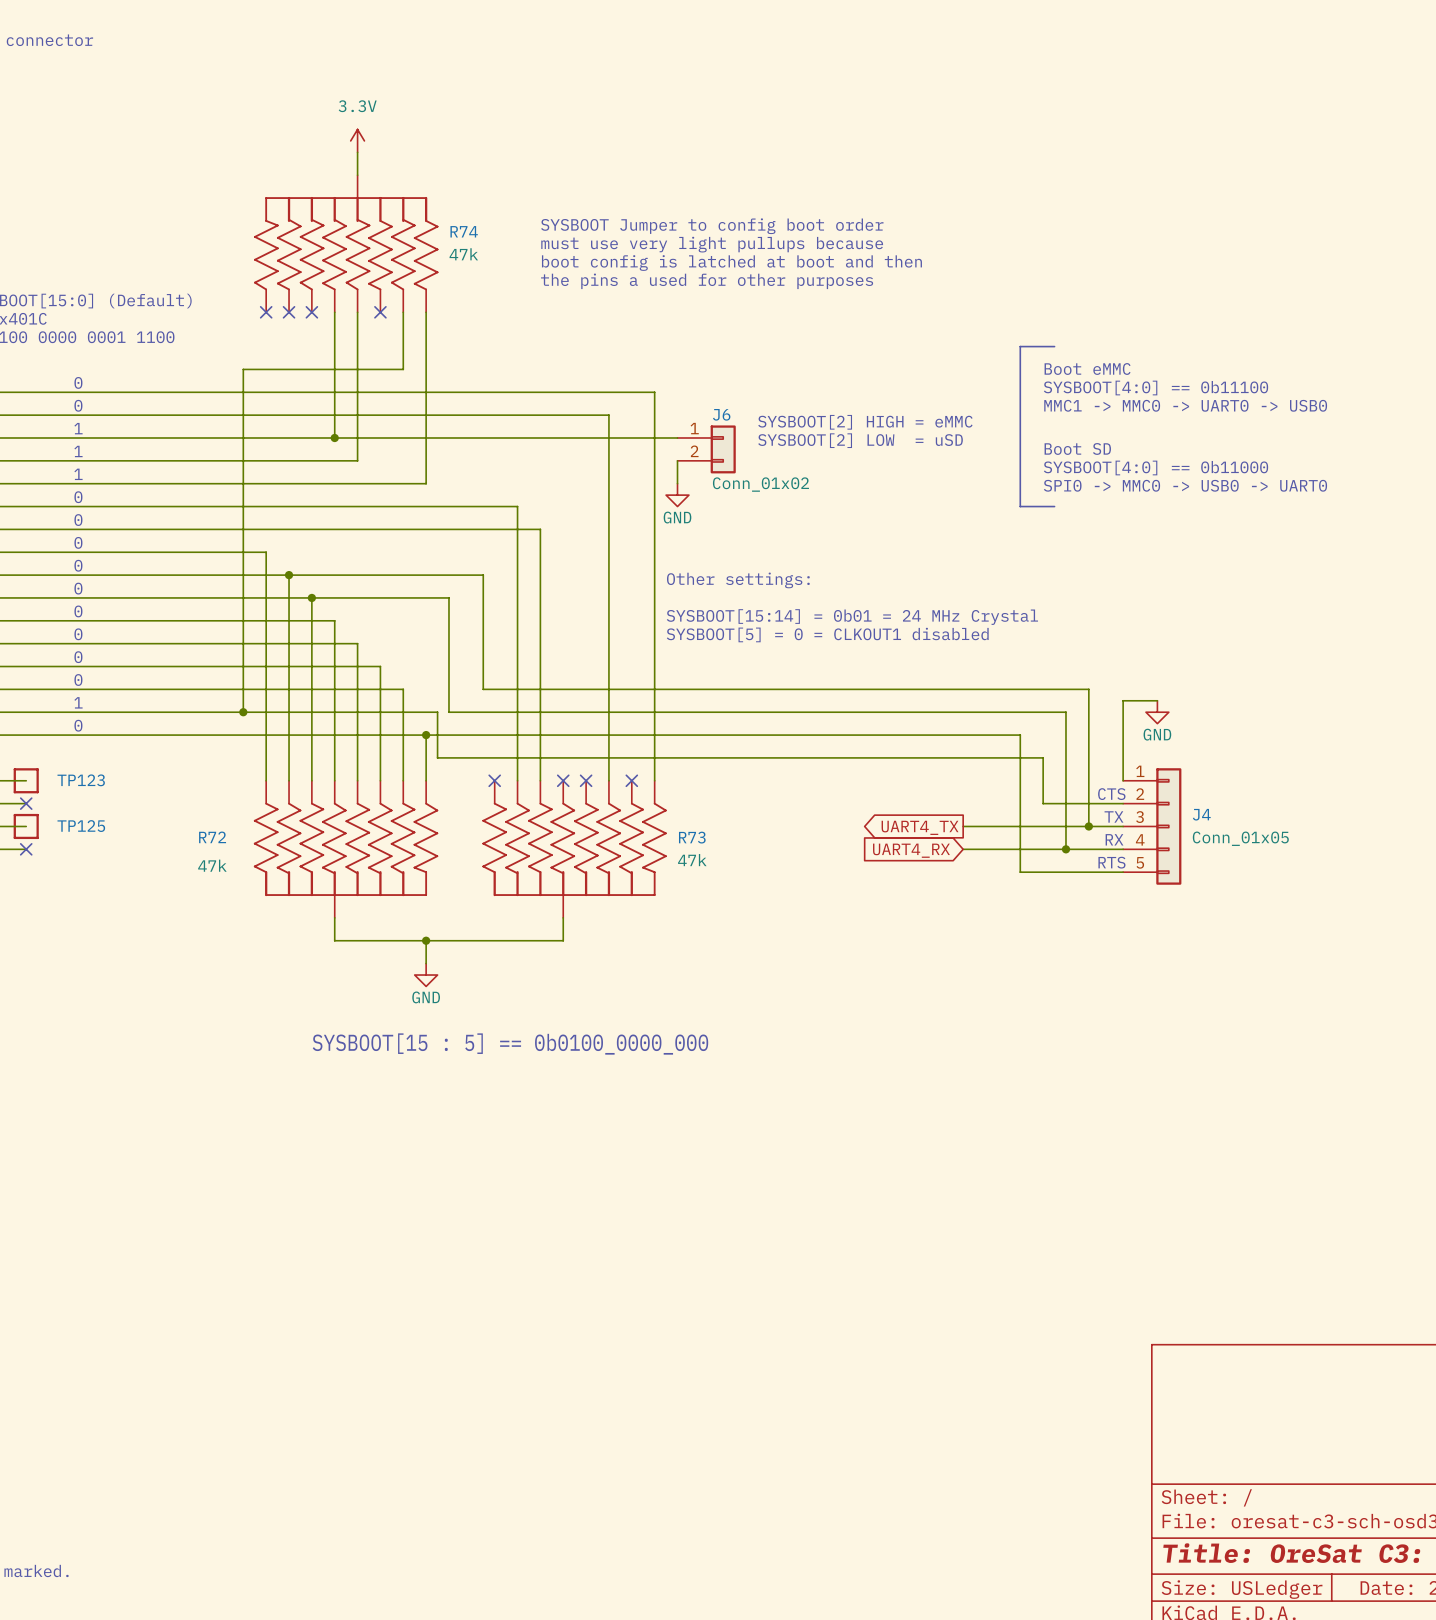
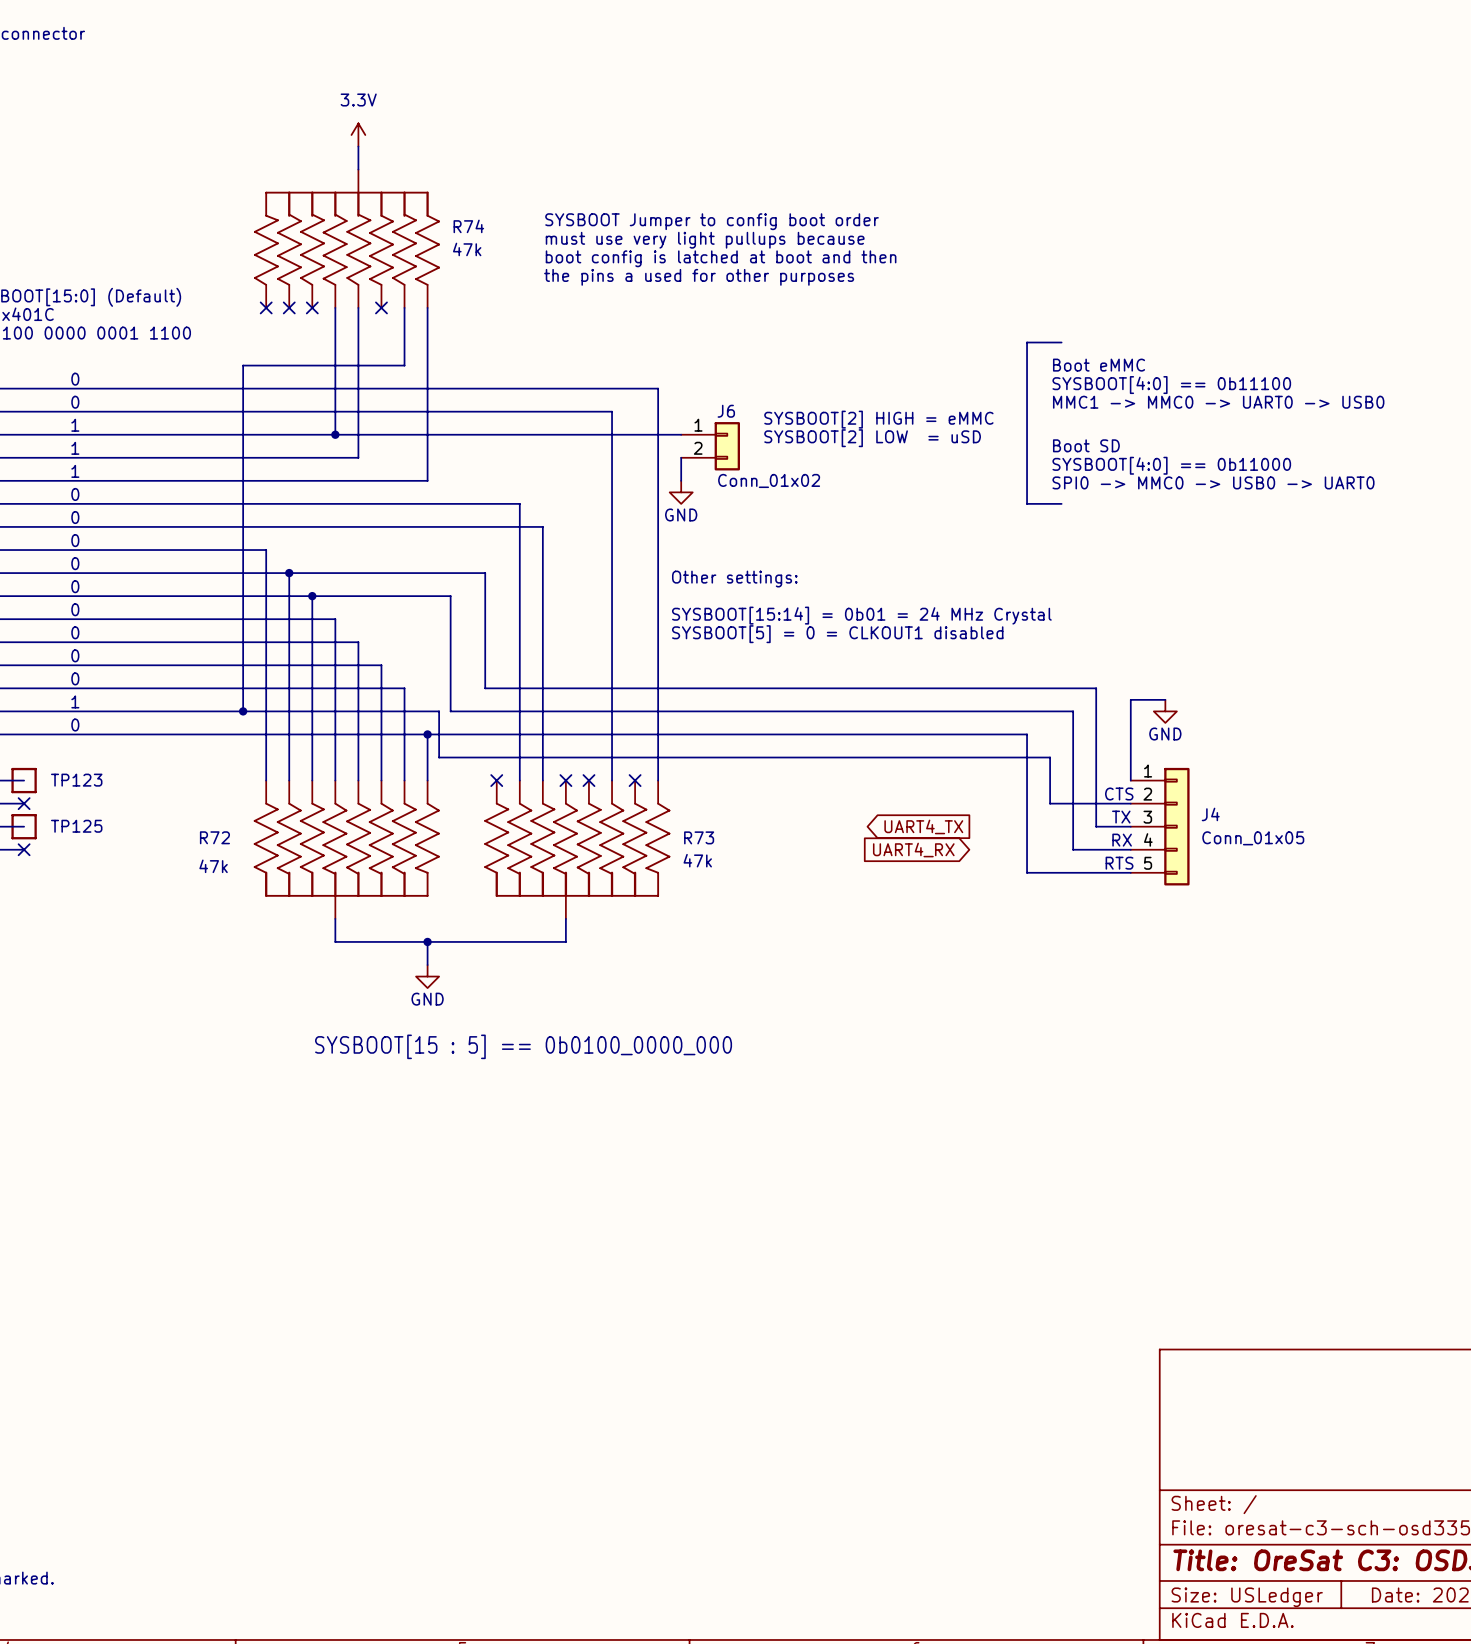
wire: (963, 826) (1088, 826) -> none
junction: (1088, 826) -> none
wire: (963, 849) (1065, 849) -> none
junction: (1065, 849) -> none

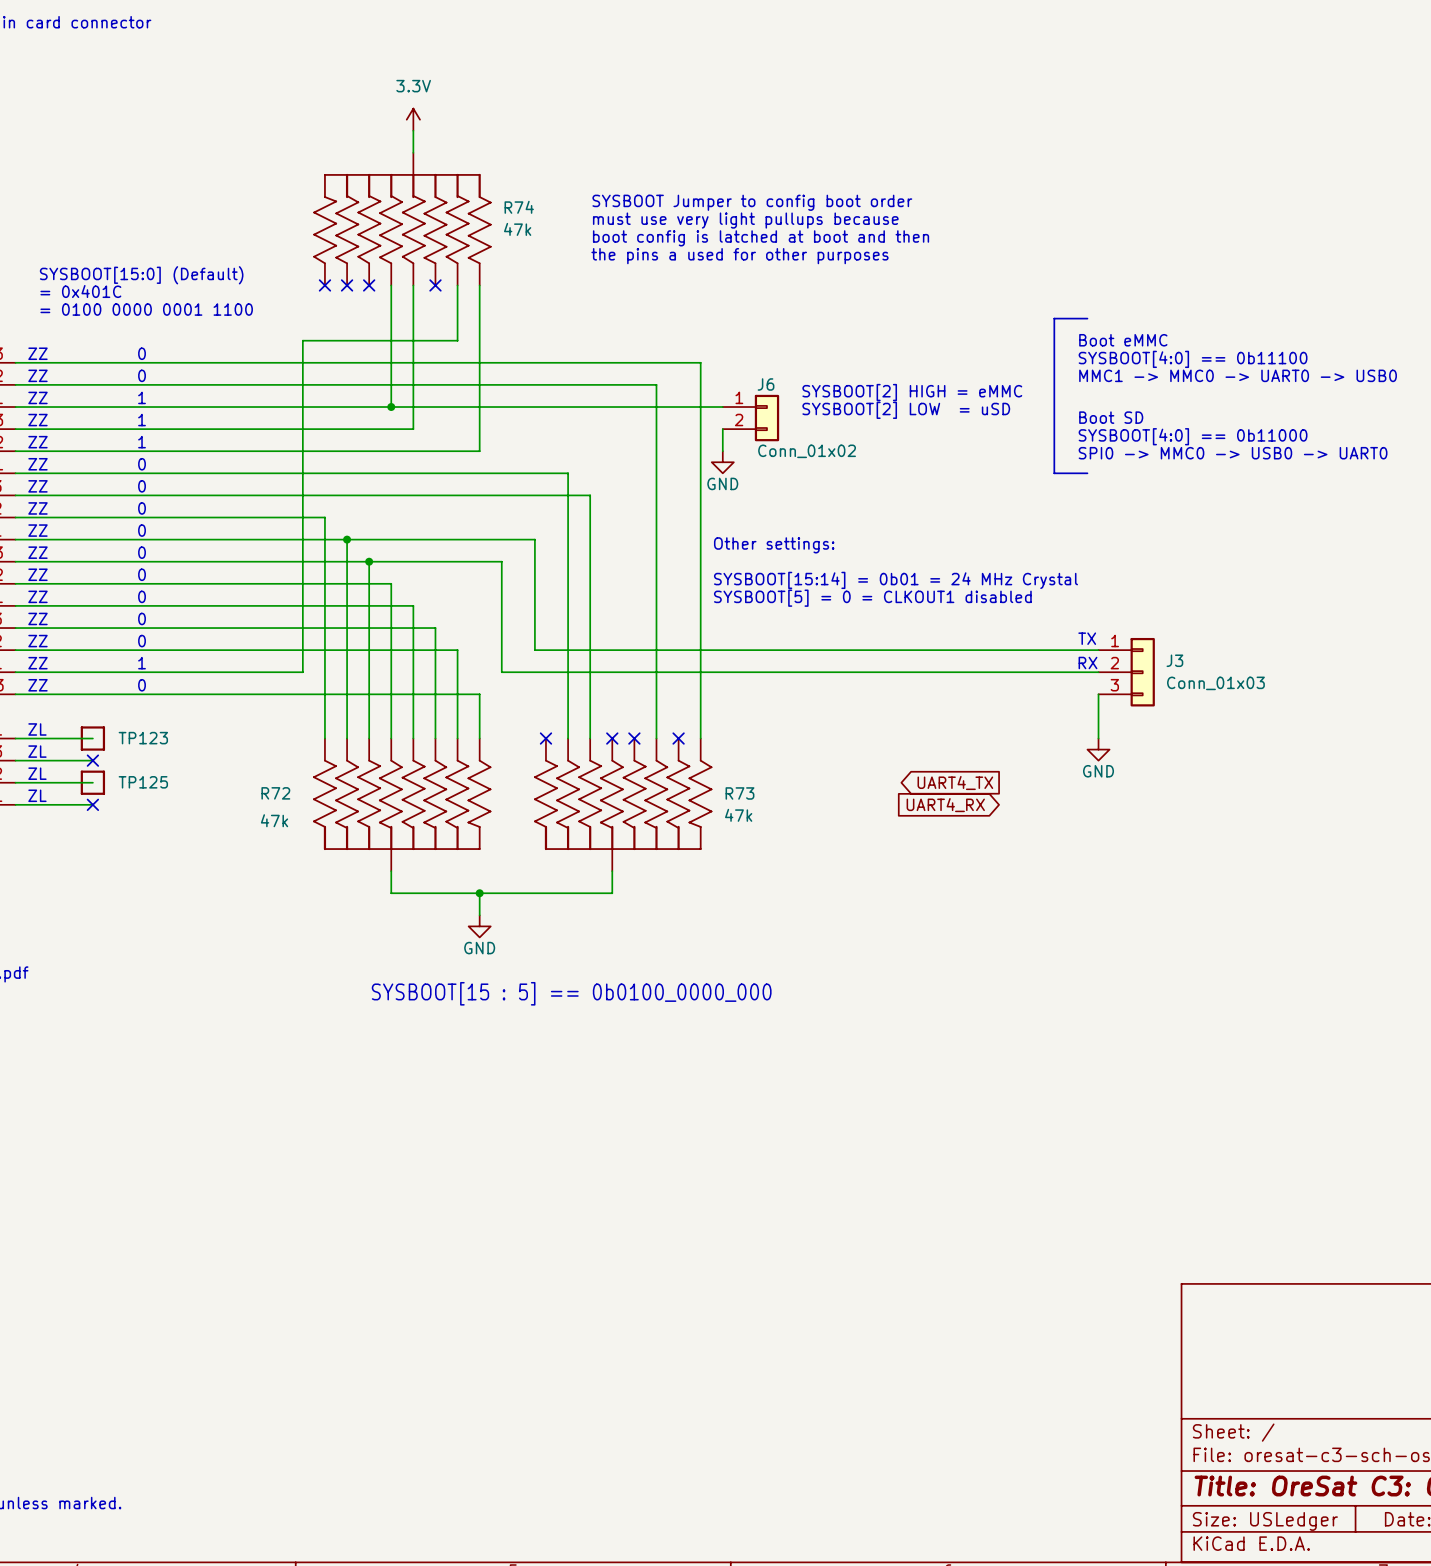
wire: (1073, 688) (1096, 688) (1096, 826) (1130, 826) -> none
wire: (1165, 699) (1130, 699) (1130, 780) -> none
wire: (243, 711) (439, 711) (439, 757) (1050, 757) (1050, 803) (1130, 803) -> none
junction: (243, 711) -> none
wire: (1073, 711) (1073, 734) -> none
J3: none -> Conn_01x03 (1126, 672)
power symbol position: GND (1165, 711) -> GND (1098, 749)
wire: (427, 734) (1027, 734) (1027, 872) (1130, 872) -> none
junction: (427, 734) -> none
wire: (1073, 780) (1073, 849) (1130, 849) -> none
text: CTS (1119, 794) -> none
text position: TX (1121, 817) -> TX (1087, 638)
J4: Conn_01x05 (1160, 826) -> none
text position: RX (1122, 840) -> RX (1087, 663)
text: RTS (1119, 863) -> none

